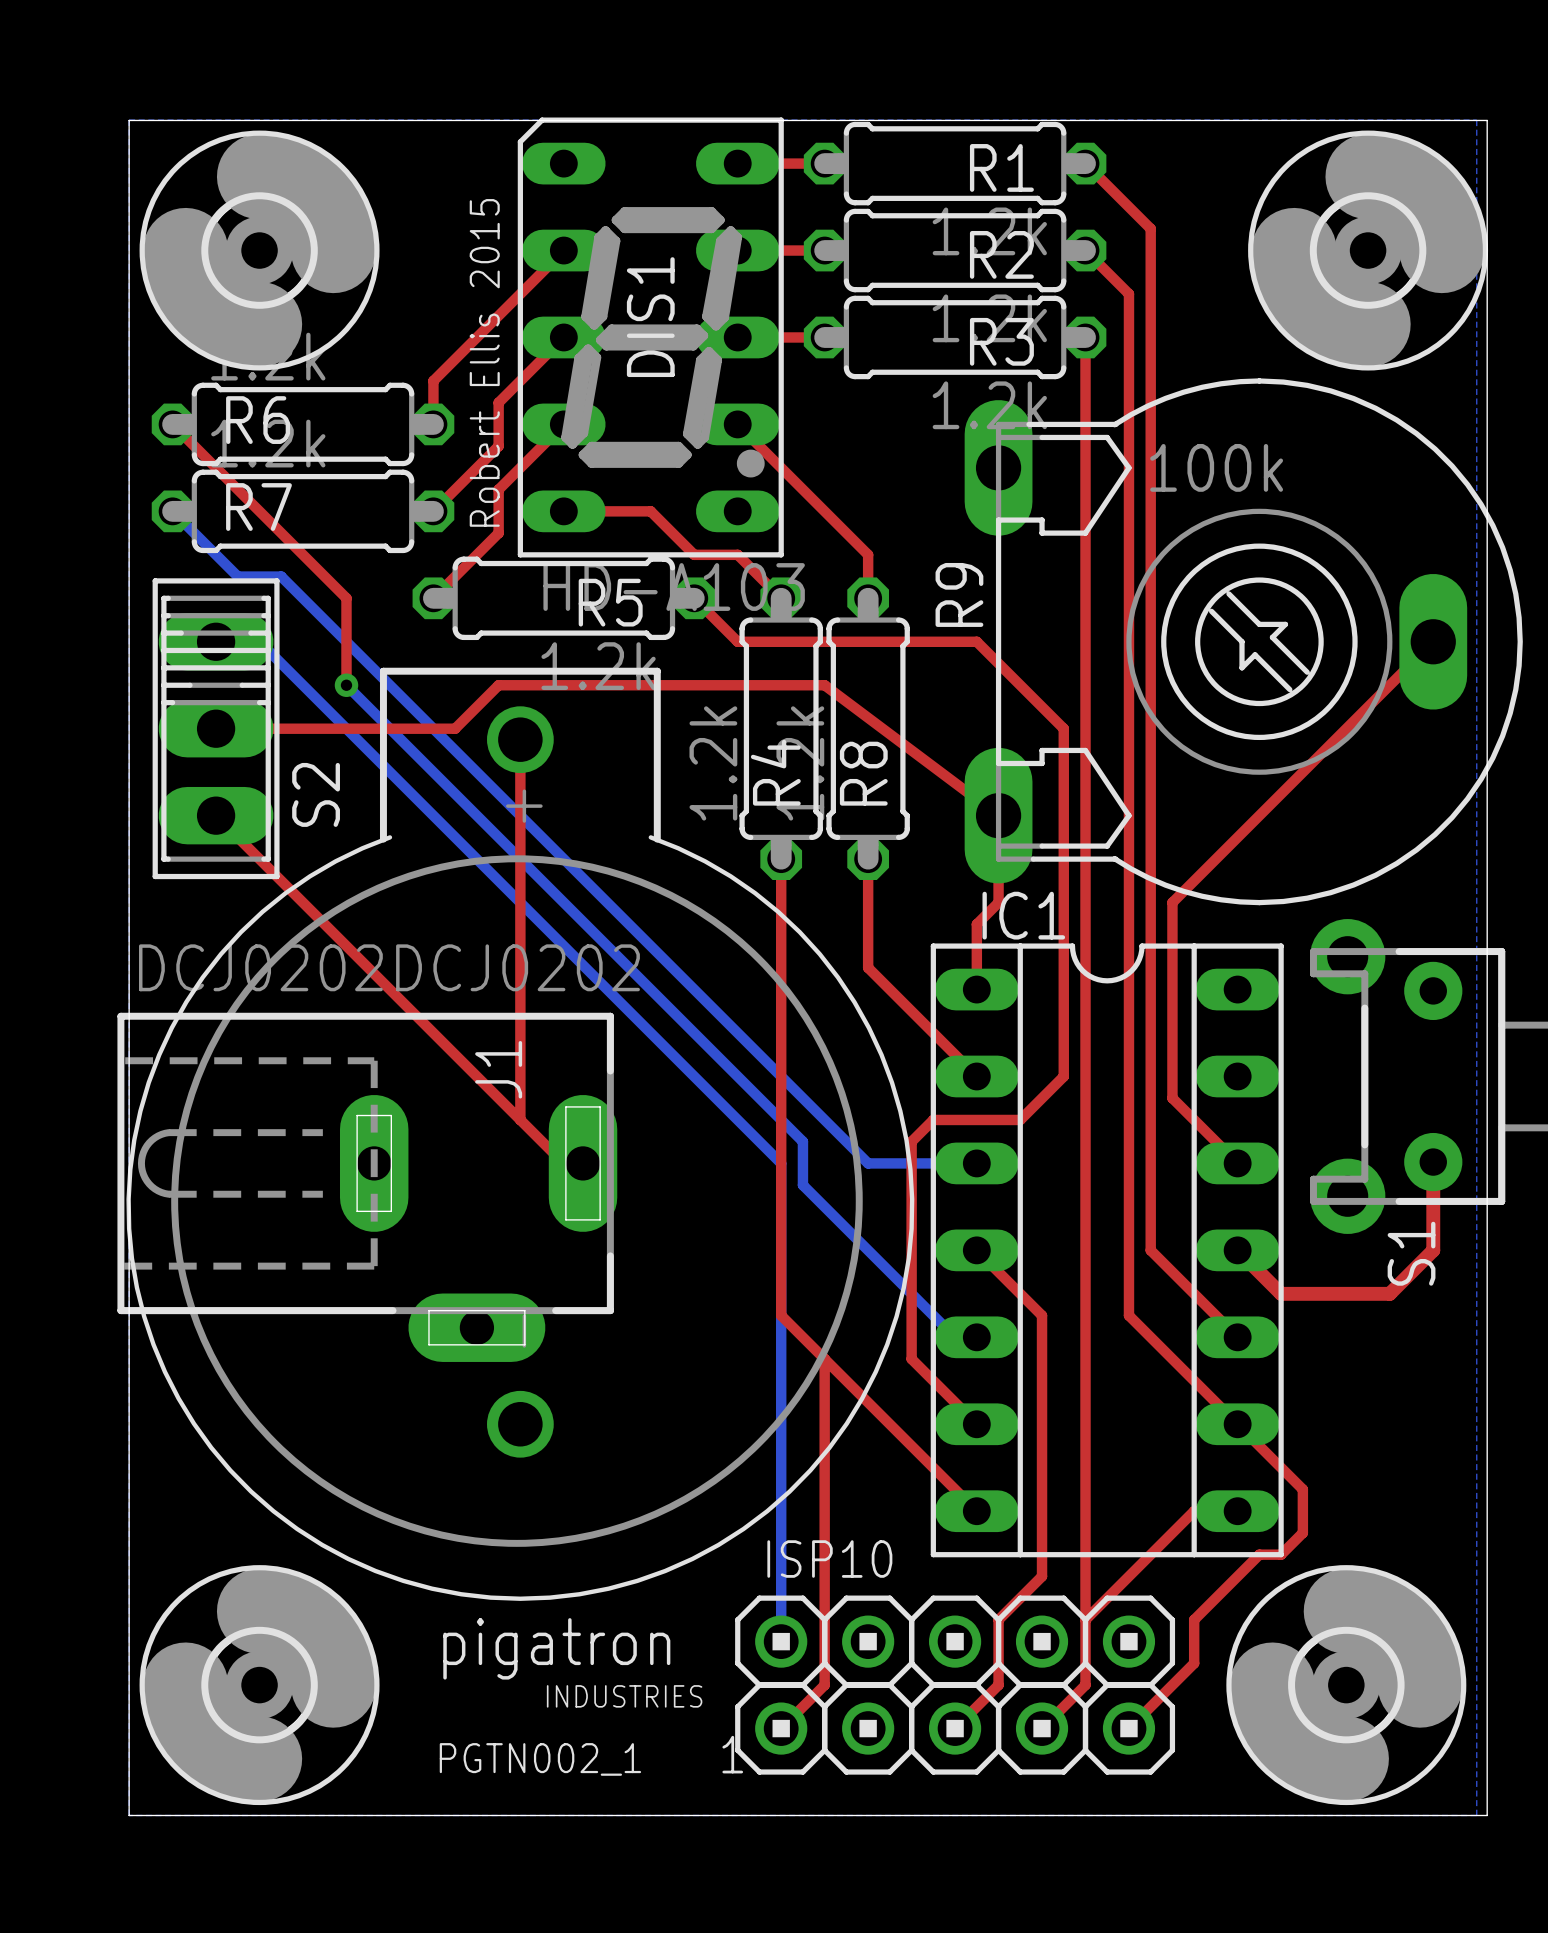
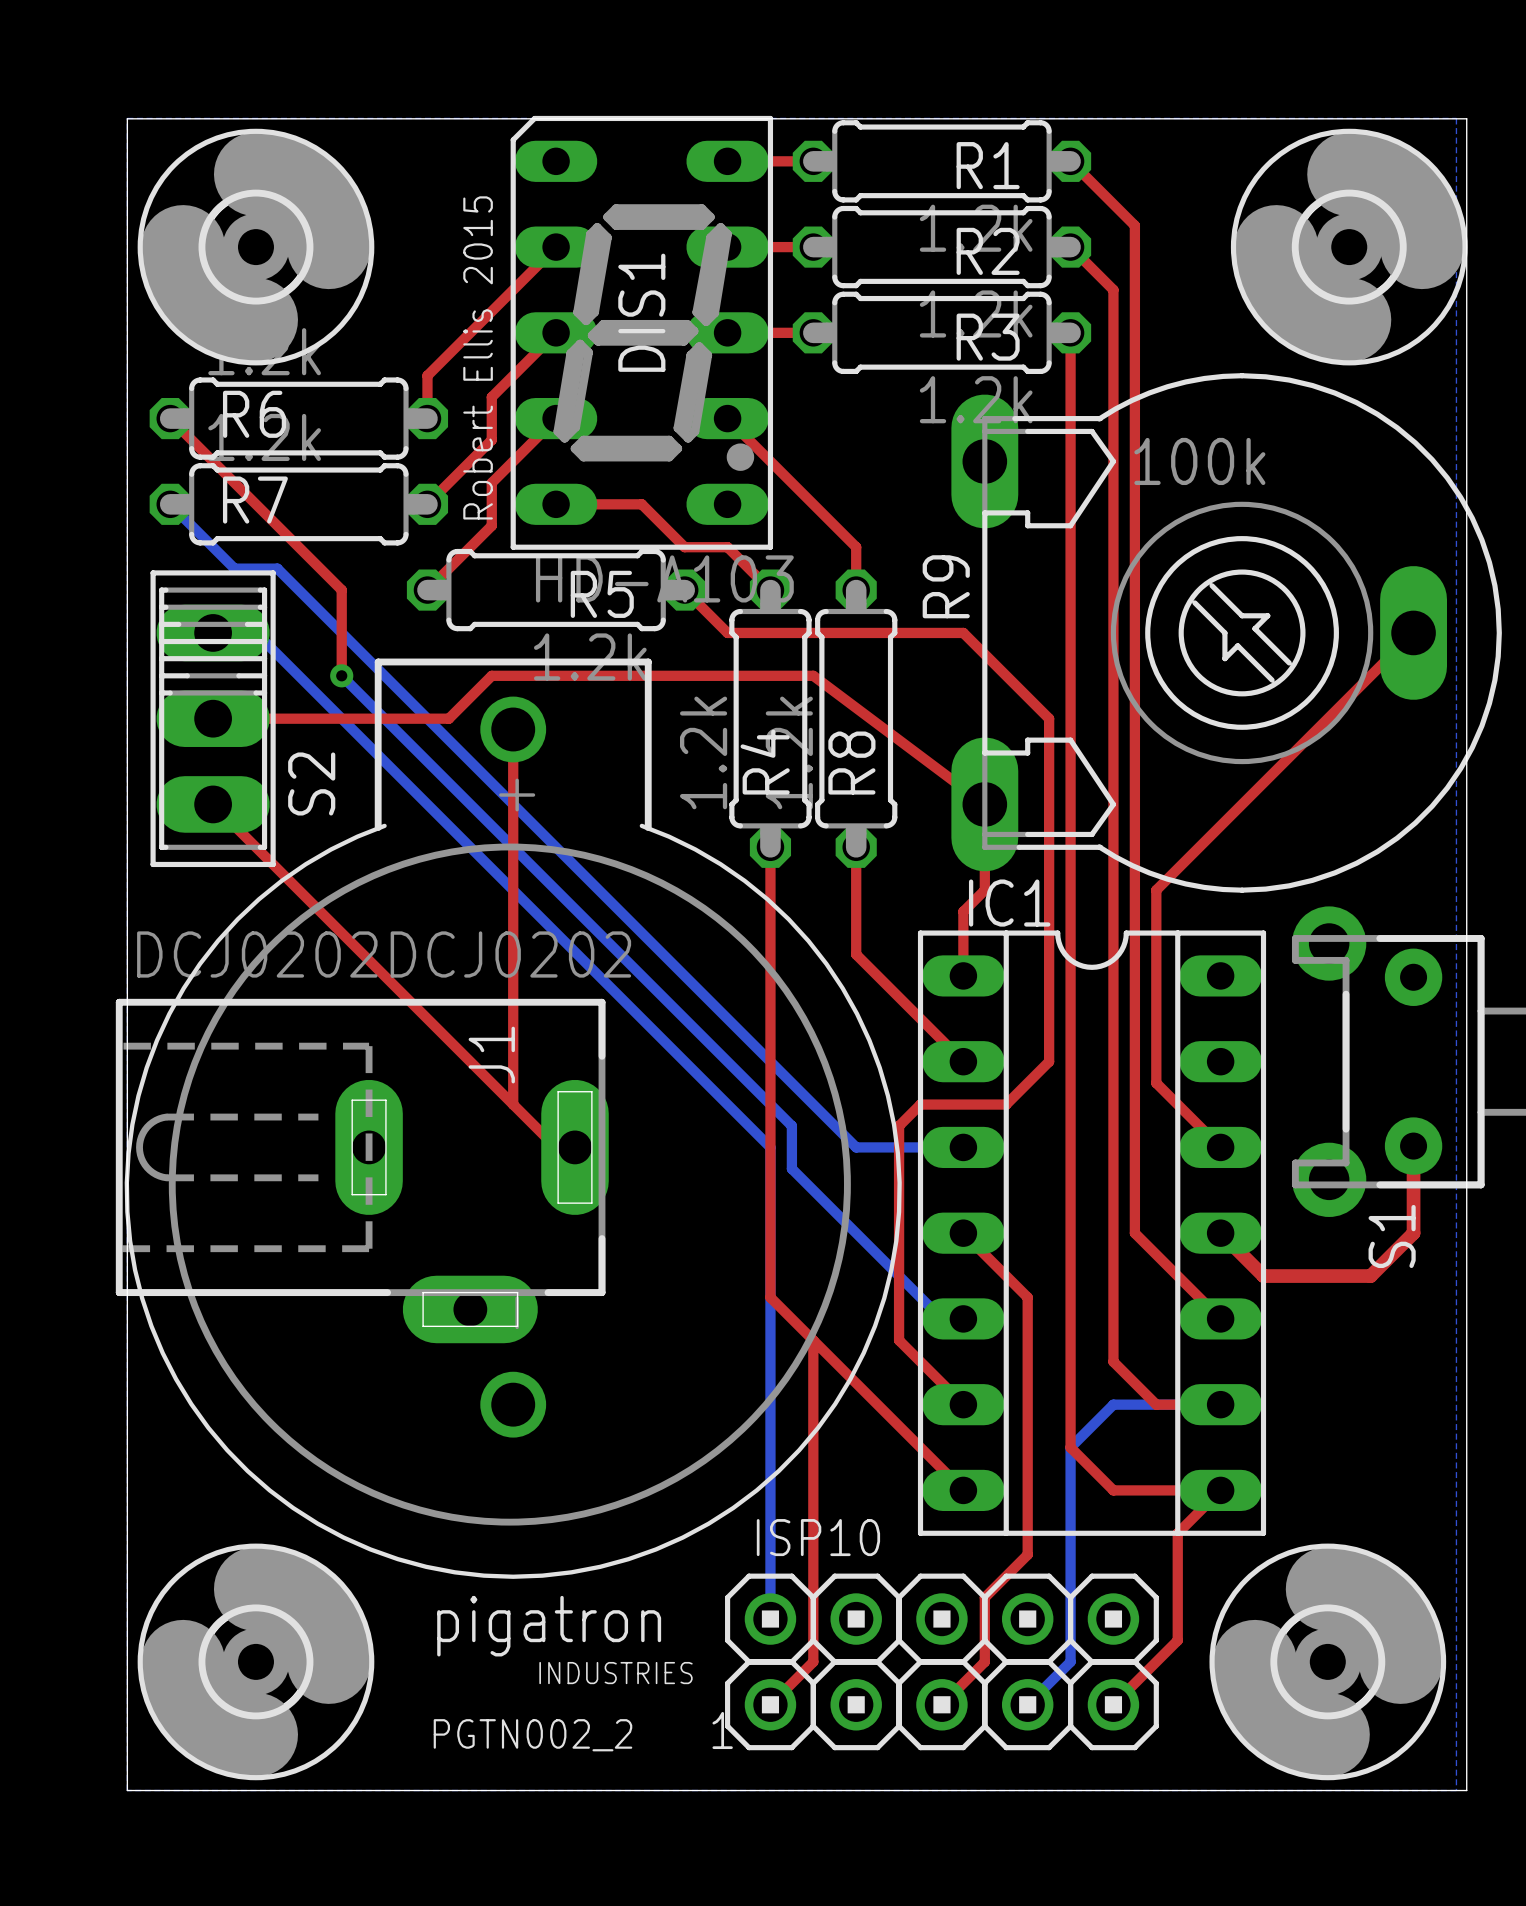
top track: (1128, 1315) (1302, 1489) (1302, 1532) (1281, 1554) (1259, 1554) (1194, 1619) -> (1113, 1297) (1113, 1361) (1156, 1404) (1220, 1404)
bottom track: none -> (1220, 1404) (1113, 1404) (1070, 1447) (1070, 1661) (1027, 1704)
top track: (1085, 1467) (1085, 1685) (1042, 1728) -> none
top track: (1194, 1511) (1085, 1619) -> (1177, 1490) (1113, 1490) (1070, 1447)
top track: none -> (1220, 1490) (1177, 1533) (1177, 1597)
text: PGTN002_1 (540, 1759) -> PGTN002_2 (532, 1735)

